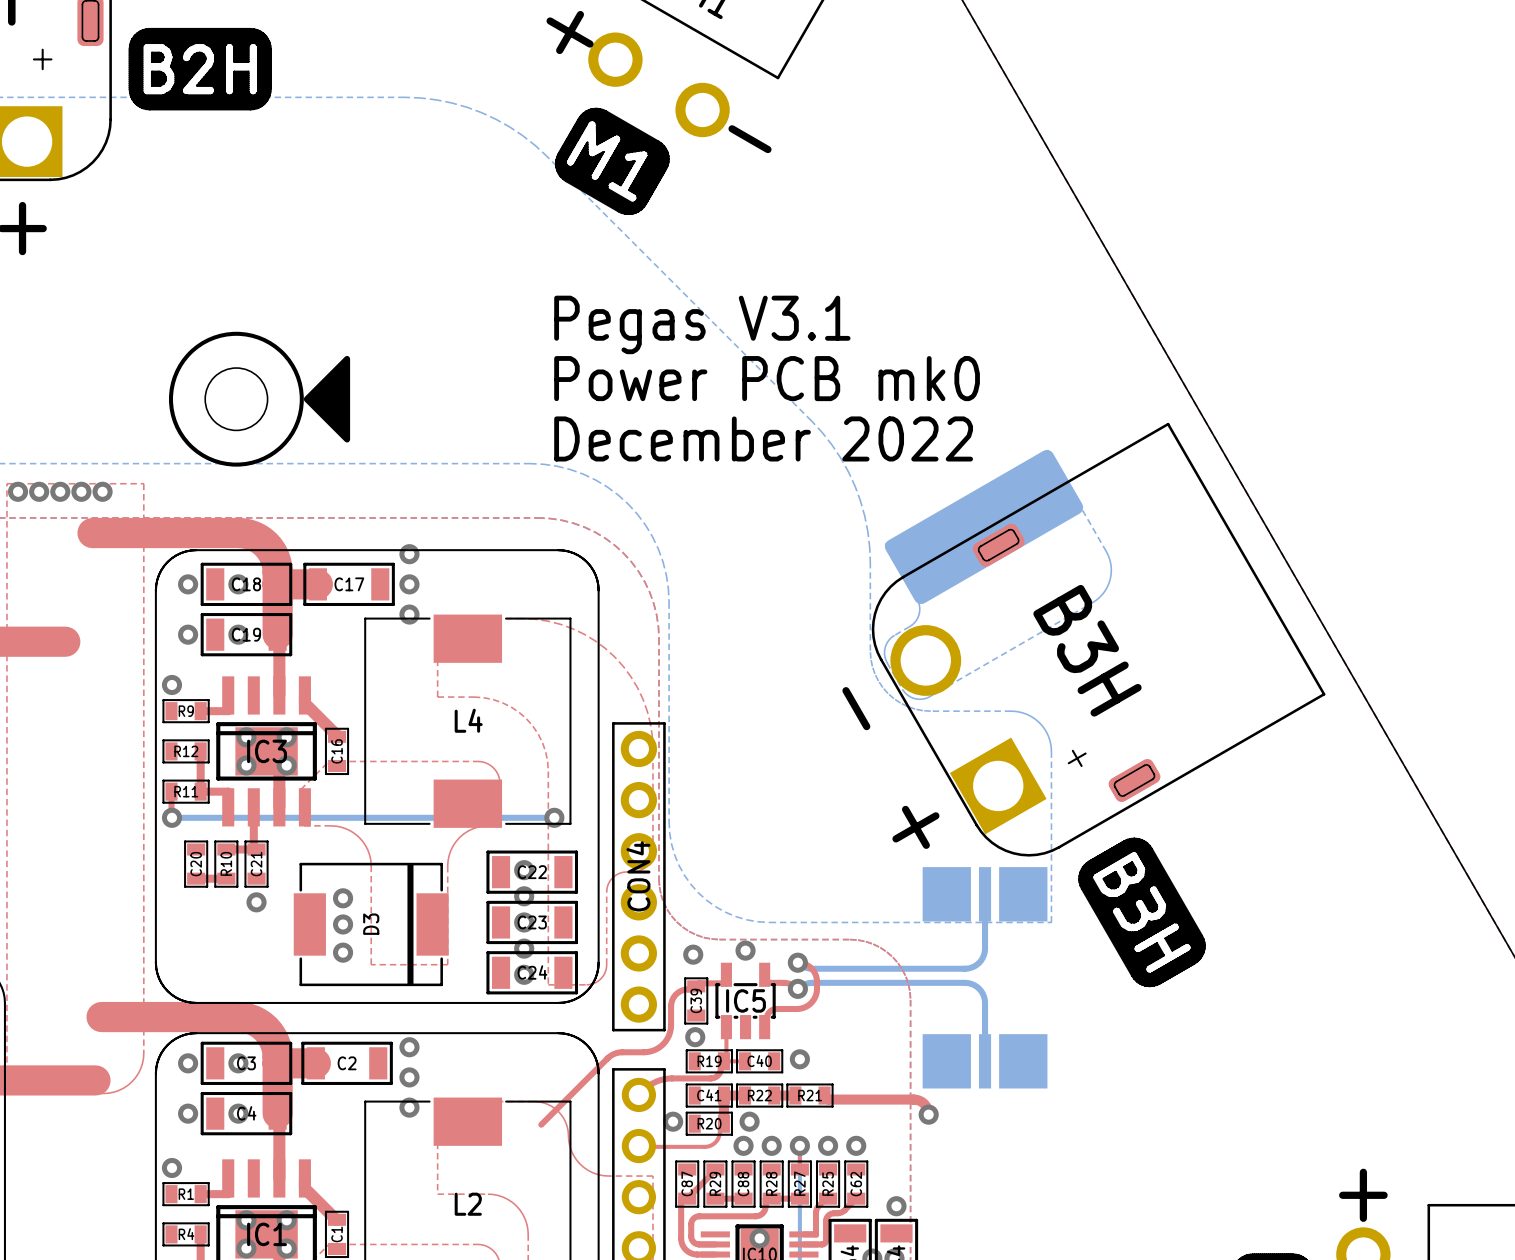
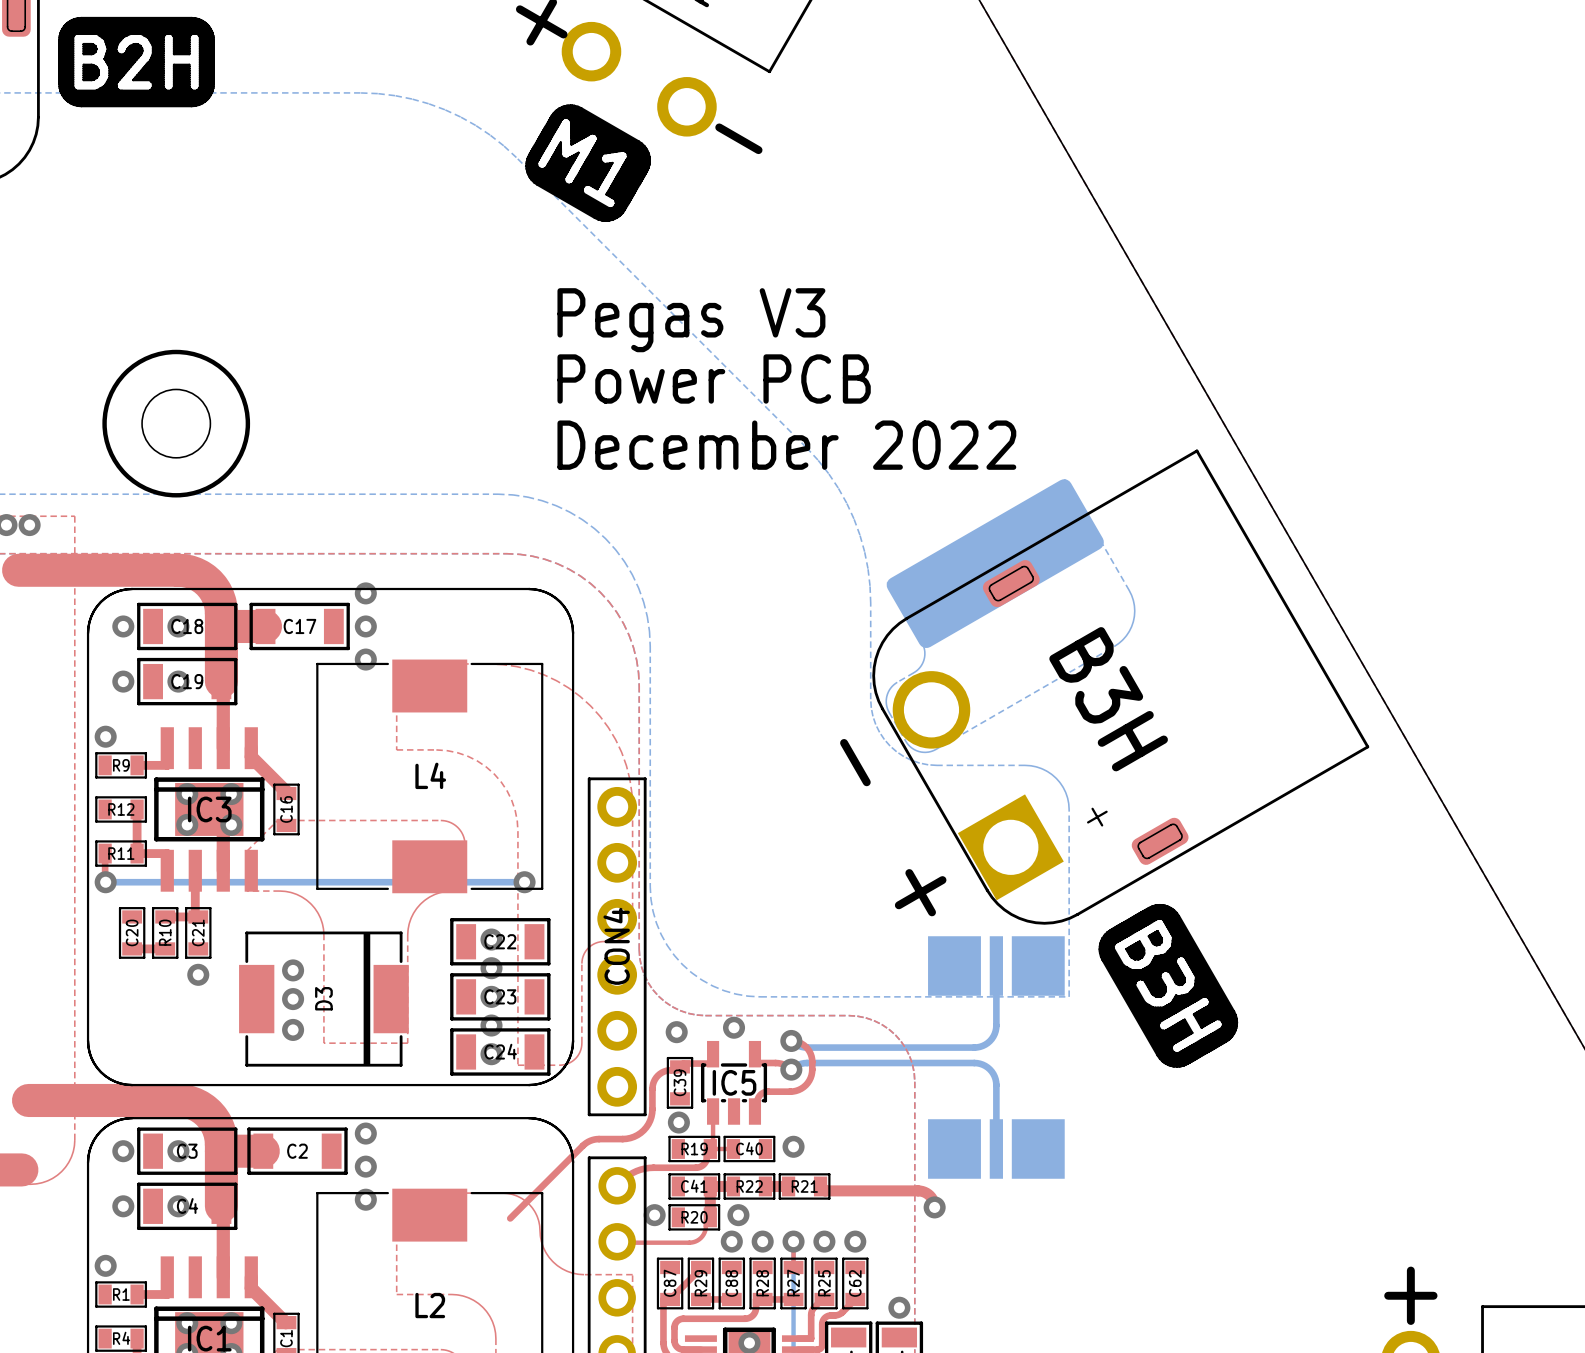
text: Pegas V3.1 (702, 324) -> Pegas V3 (691, 320)
drawing: [303, 355, 351, 443] -> none
text: Power PCB mk0 (767, 378) -> Power PCB (714, 379)
text position: December 2022 (763, 438) -> December 2022 (786, 445)

